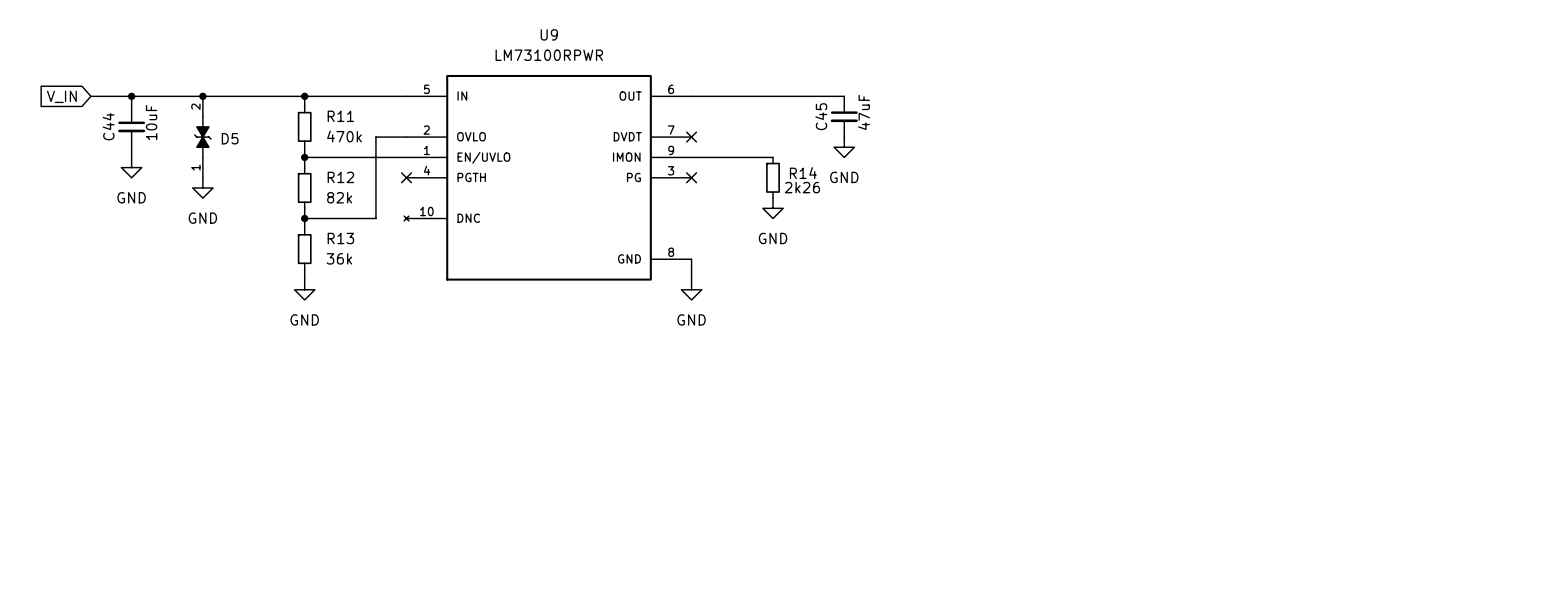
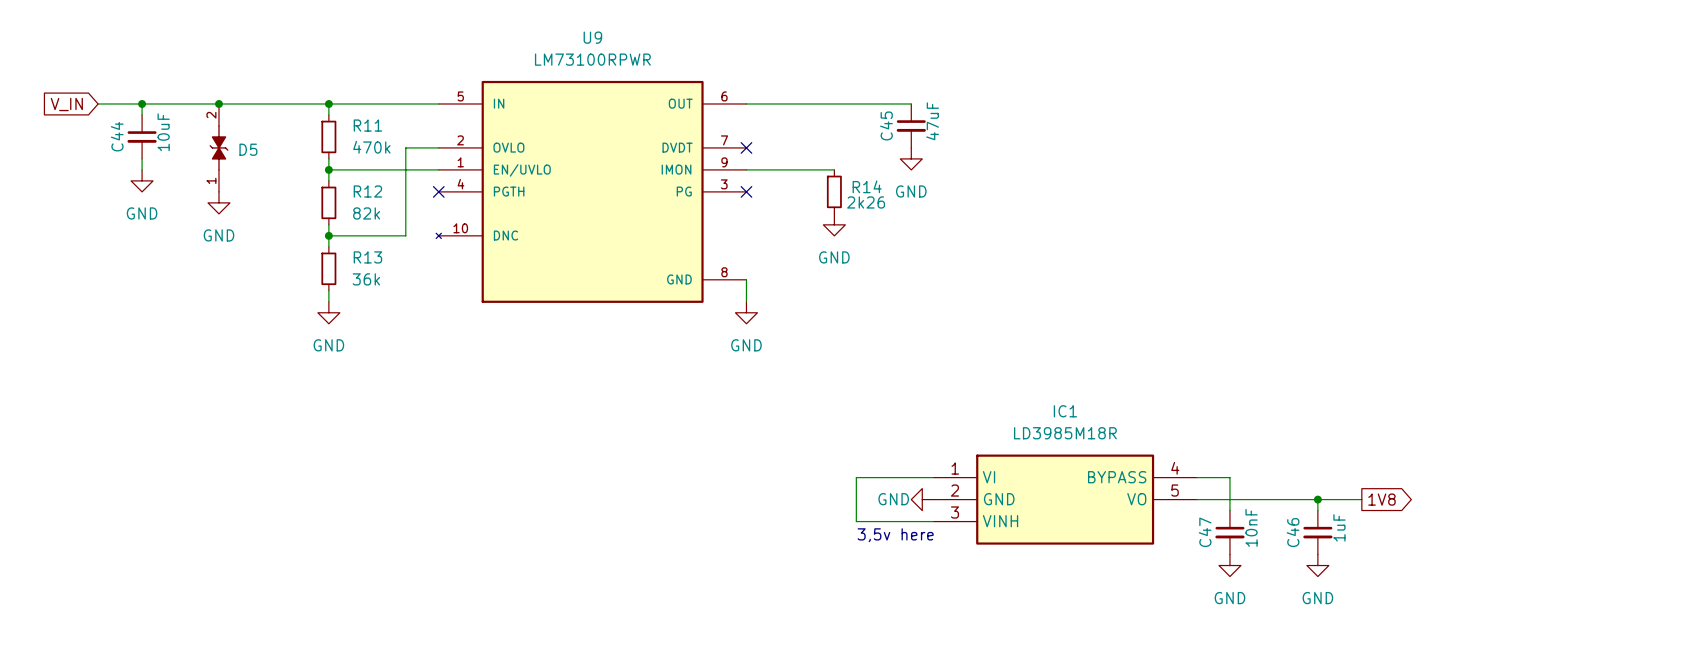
wire: none -> (933, 477) (856, 477) (856, 521) (933, 521)
wire: none -> (1197, 477) (1229, 477) (1229, 510)
power symbol: none -> GND (922, 499)
IC1: none -> LD3985M18R (1065, 499)
wire: none -> (1197, 499) (1361, 499)
wire: none -> (1317, 499) (1317, 510)
junction: none -> (1317, 499)
global label: none -> 1V8 (1382, 499)
C47: none -> 10nF (1229, 532)
C46: none -> 1uF (1317, 532)
text: none -> 3,5v here (895, 535)
power symbol: none -> GND (1229, 565)
power symbol: none -> GND (1317, 565)

